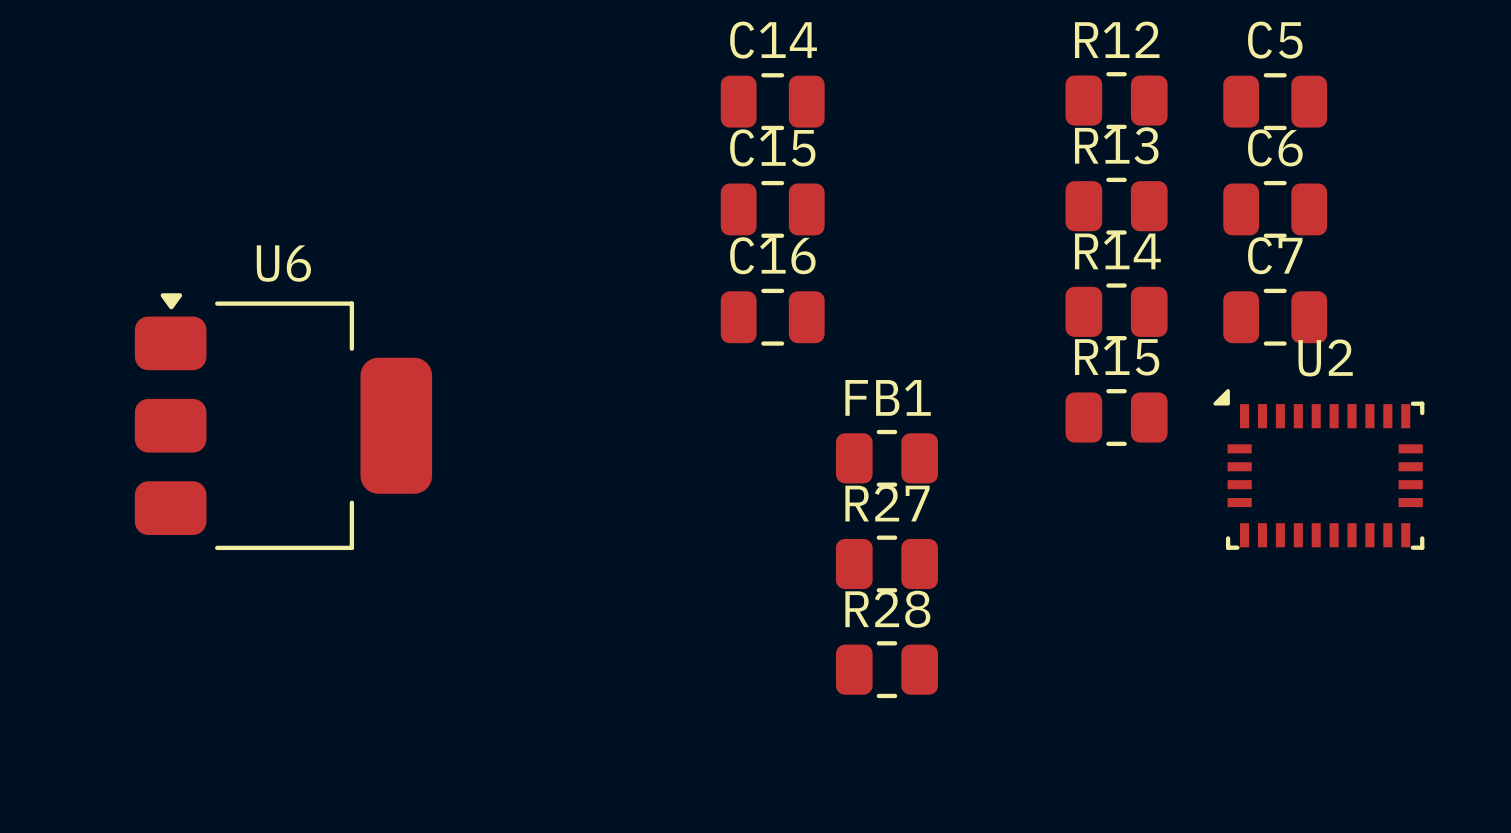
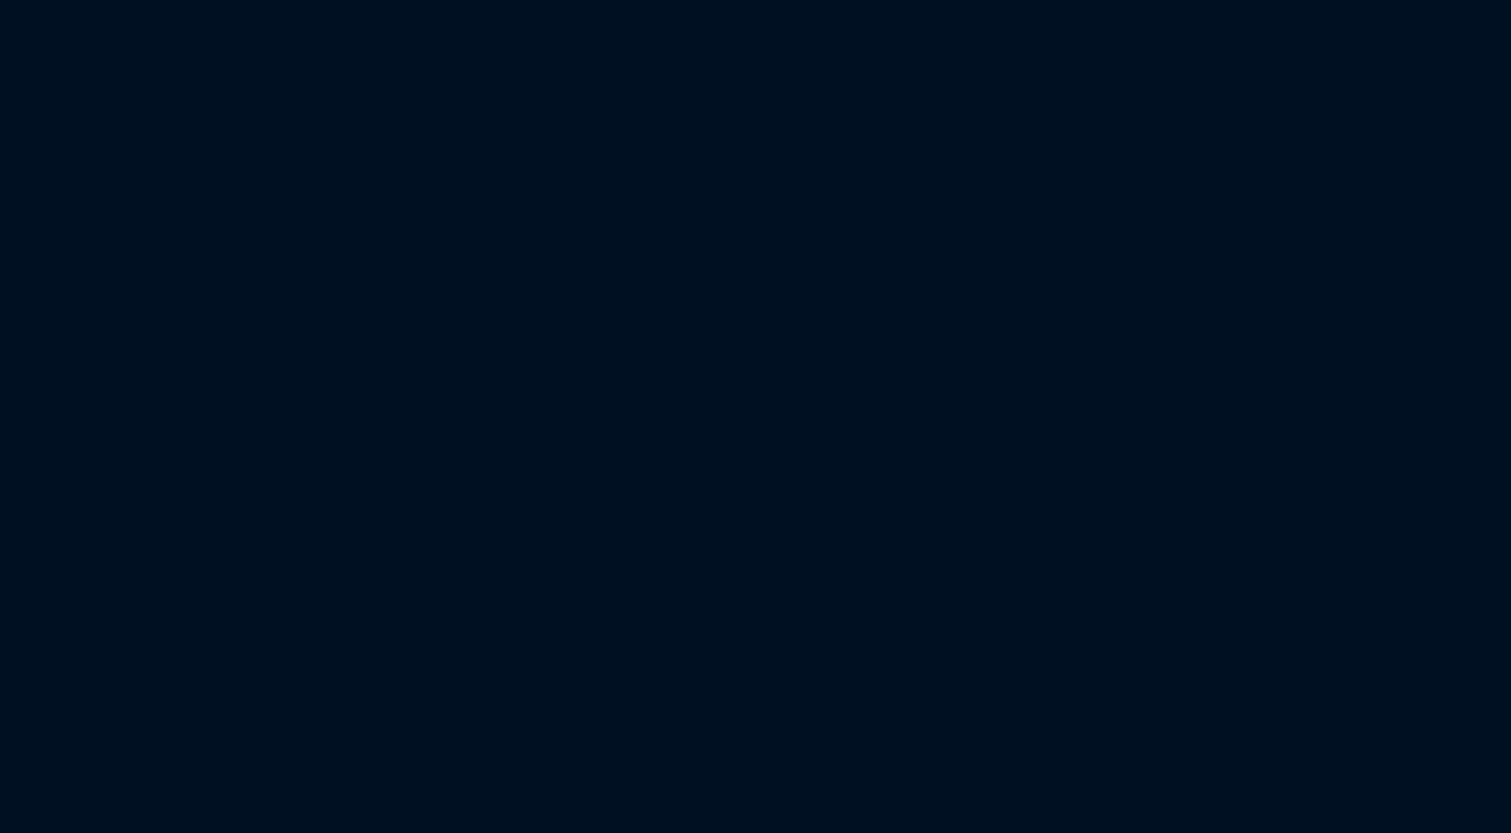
R12: (1116, 100) -> none
C14: (772, 101) -> none
C5: (1275, 101) -> none
R13: (1116, 206) -> none
C15: (772, 209) -> none
C6: (1275, 209) -> none
R14: (1116, 311) -> none
C16: (772, 317) -> none
C7: (1275, 317) -> none
R15: (1116, 417) -> none
U6: (283, 421) -> none
FB1: (886, 458) -> none
U2: (1318, 469) -> none
R27: (886, 564) -> none
R28: (886, 669) -> none

